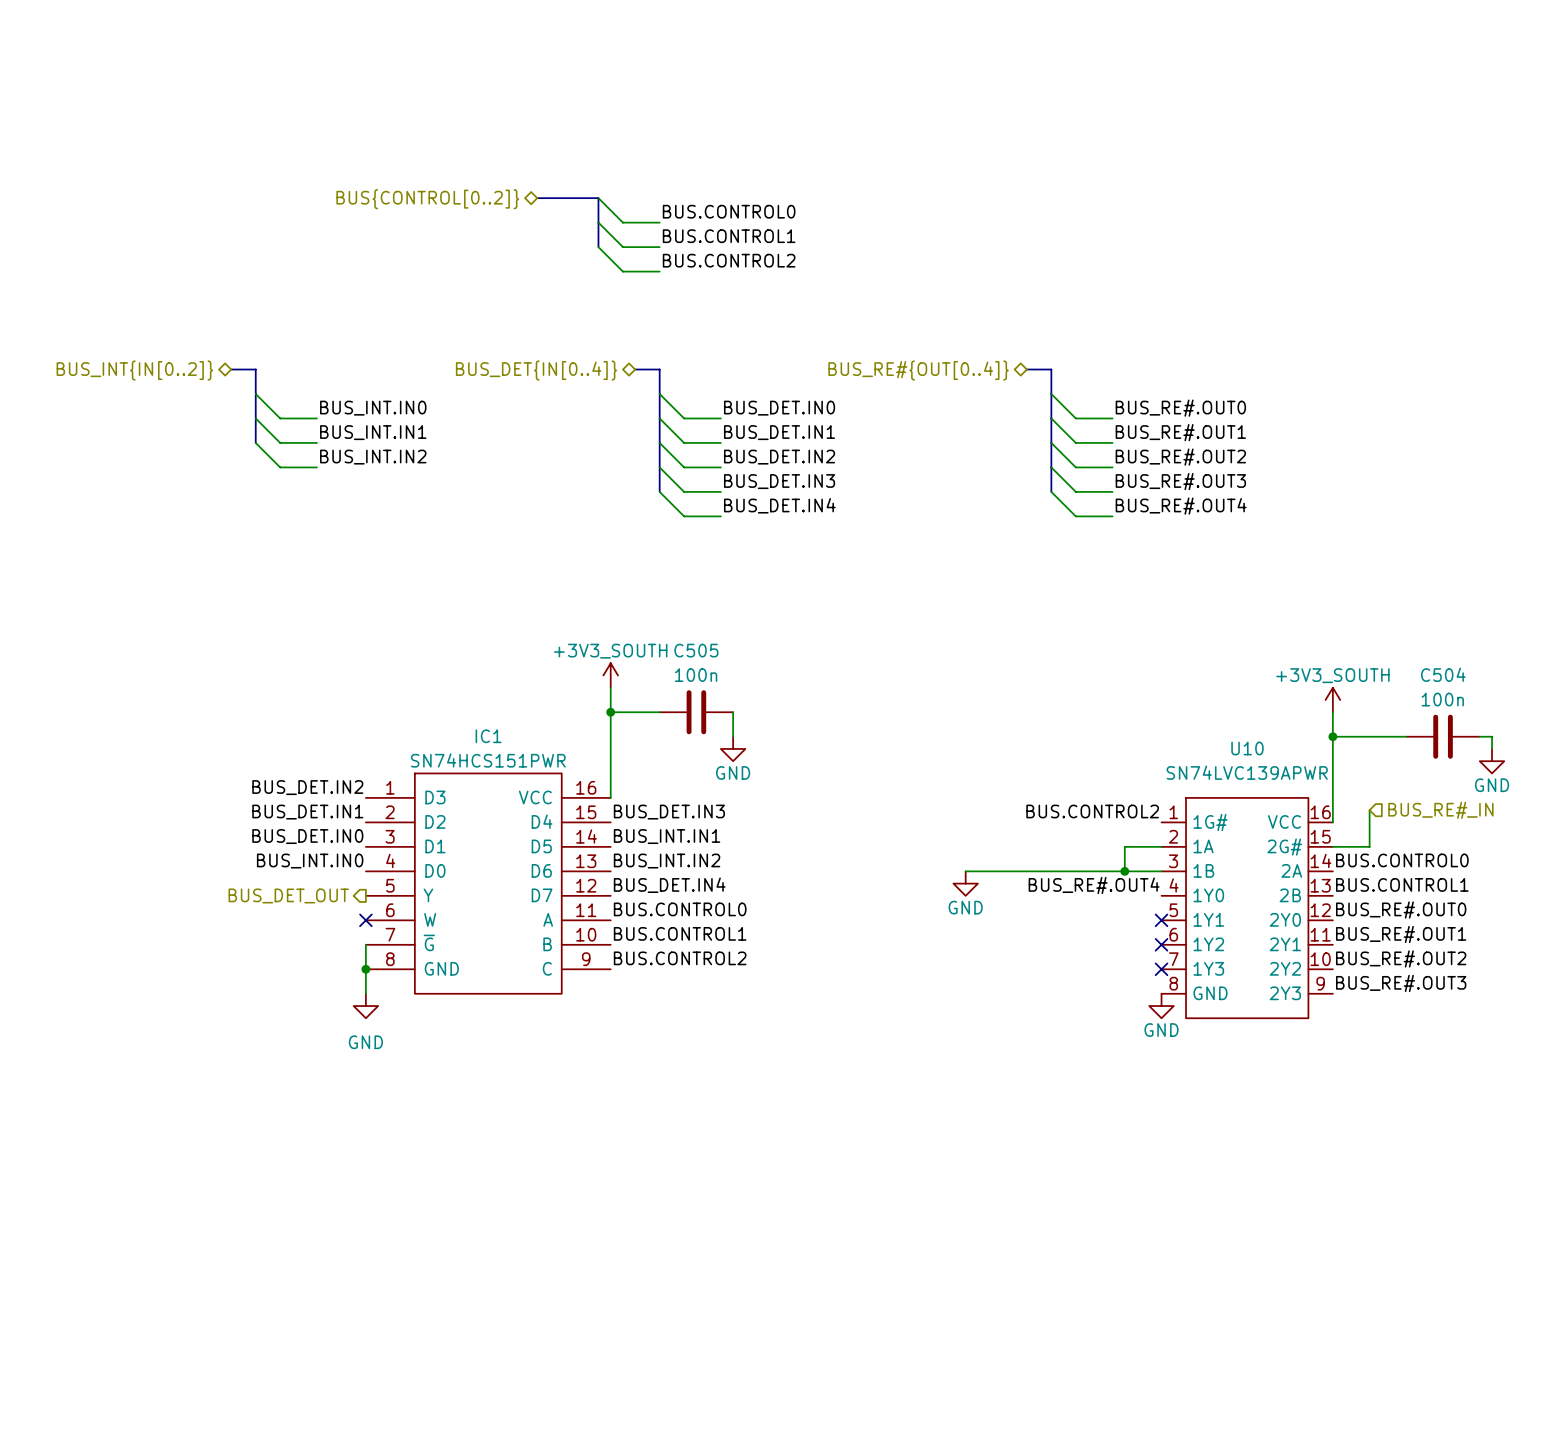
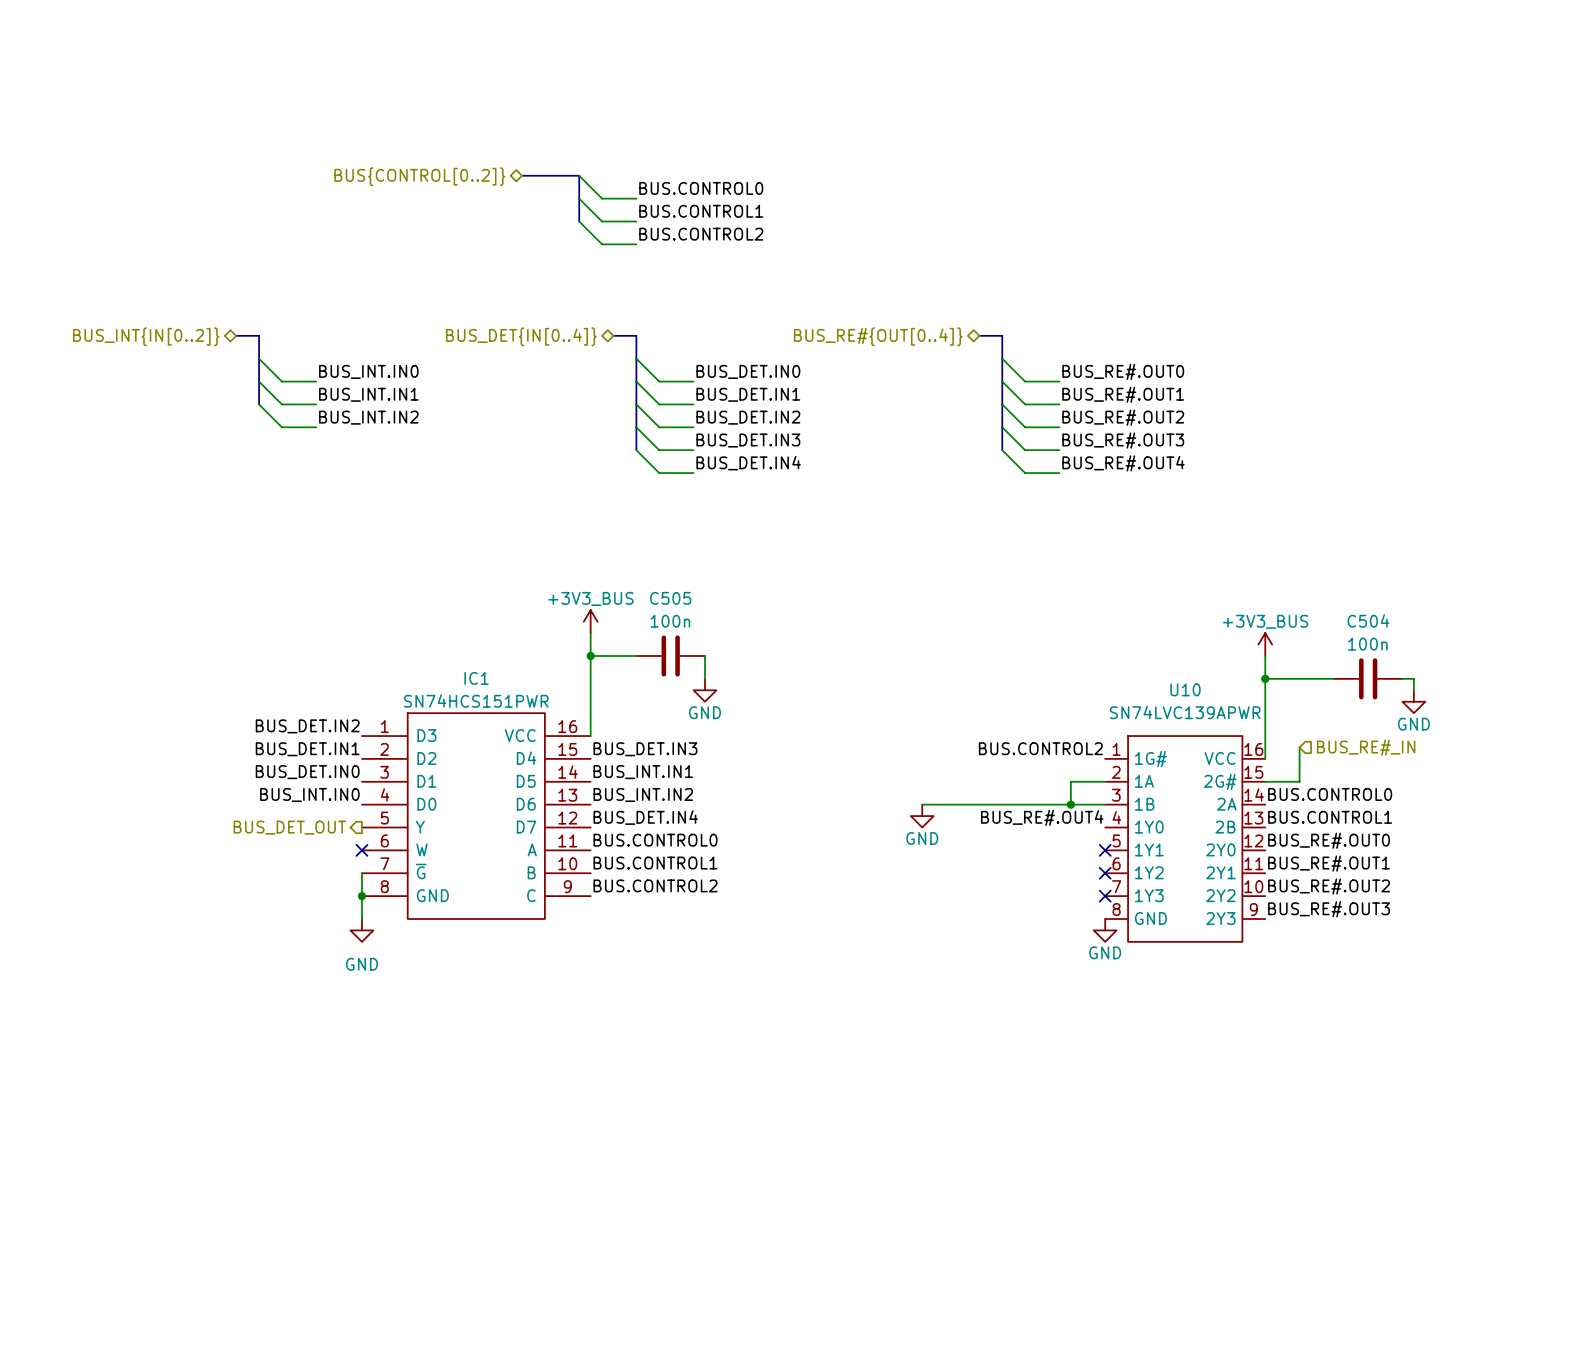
power symbol: +3V3_SOUTH (610, 675) -> +3V3_BUS (590, 621)
power symbol: +3V3_SOUTH (1332, 700) -> +3V3_BUS (1265, 644)

